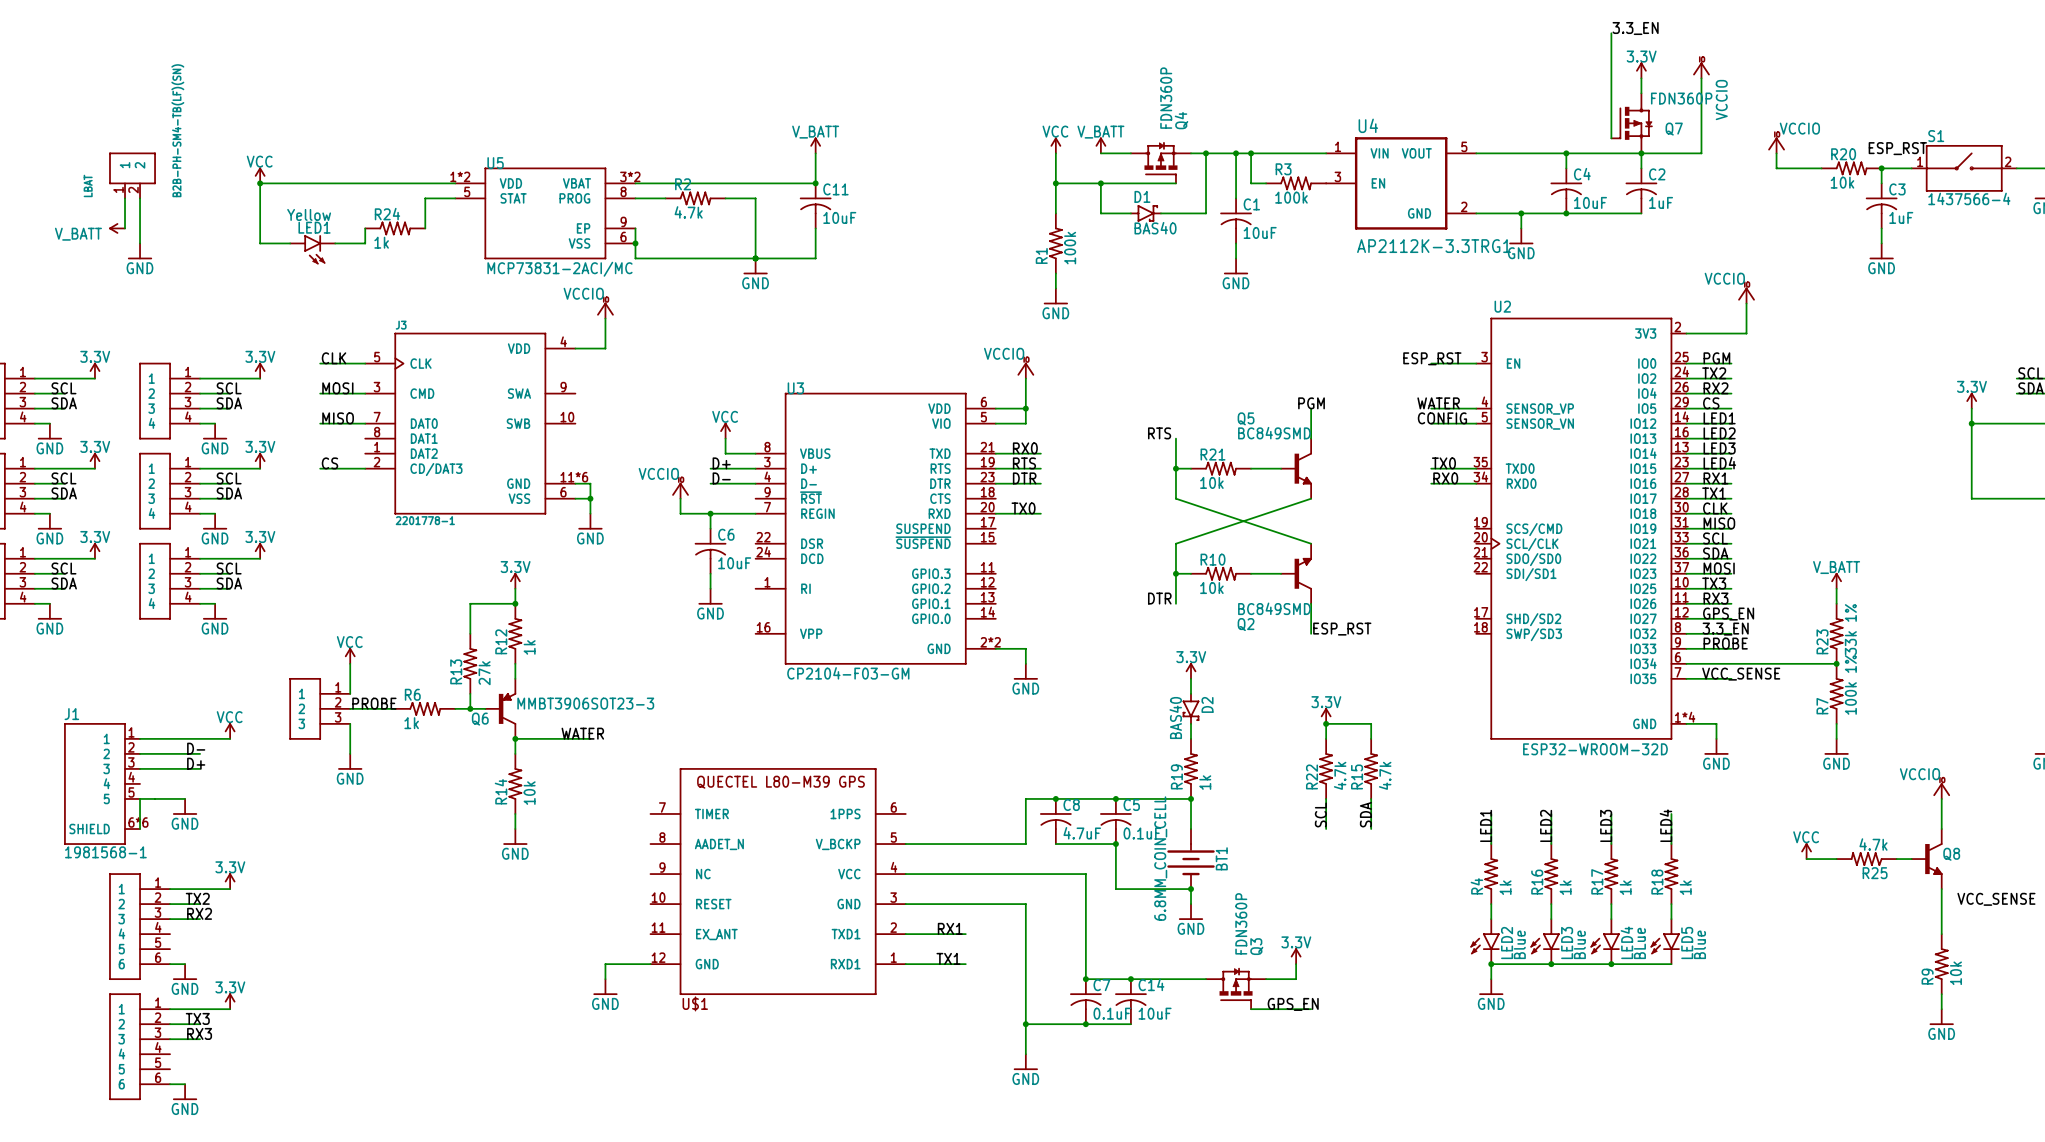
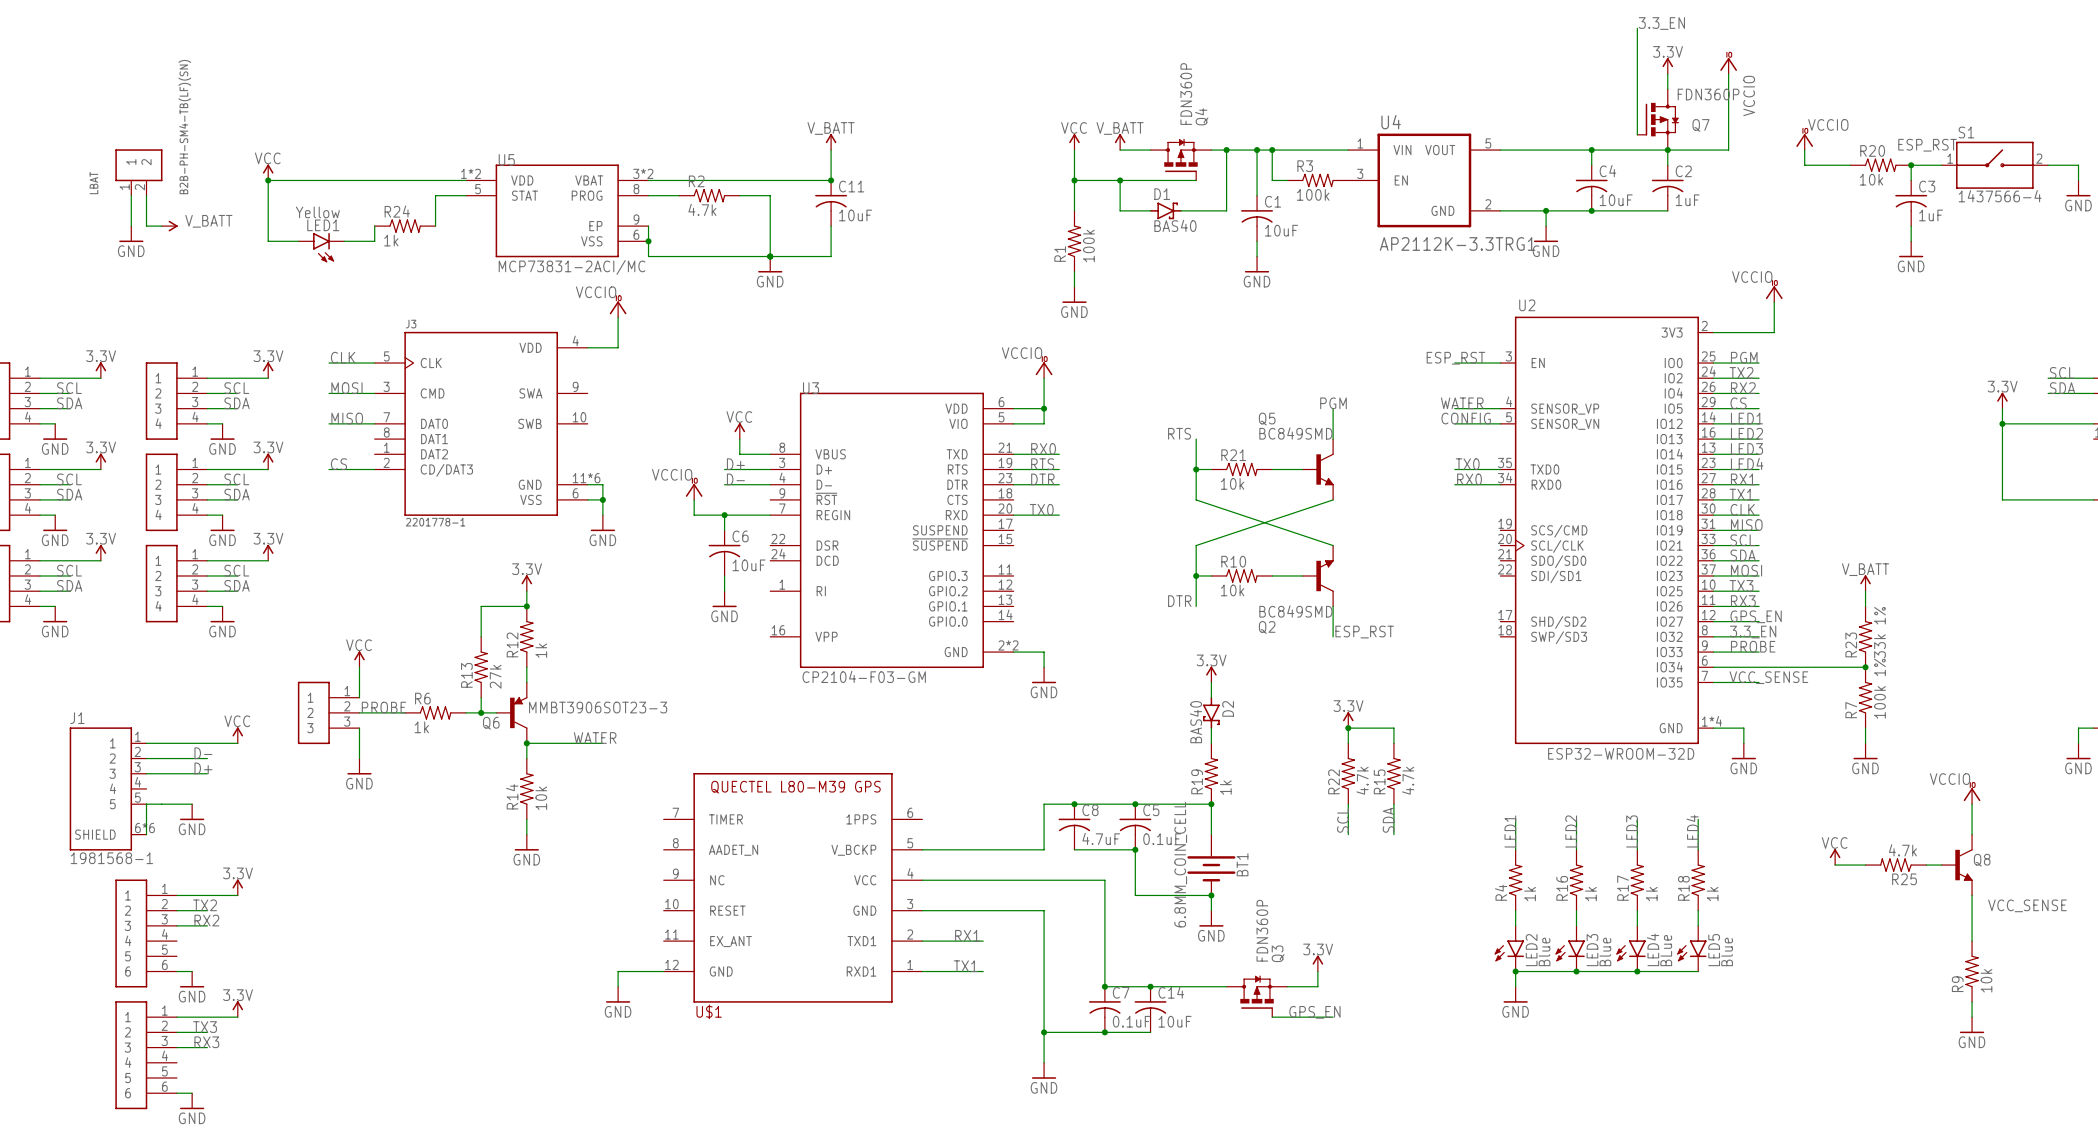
power symbol rotation: 0° (113, 228) -> 180° (173, 226)
power symbol position: V_BATT (117, 228) -> V_BATT (169, 226)
wire: (140, 228) (140, 243) -> (146, 226) (161, 226)
power symbol position: GND (140, 251) -> GND (131, 234)

